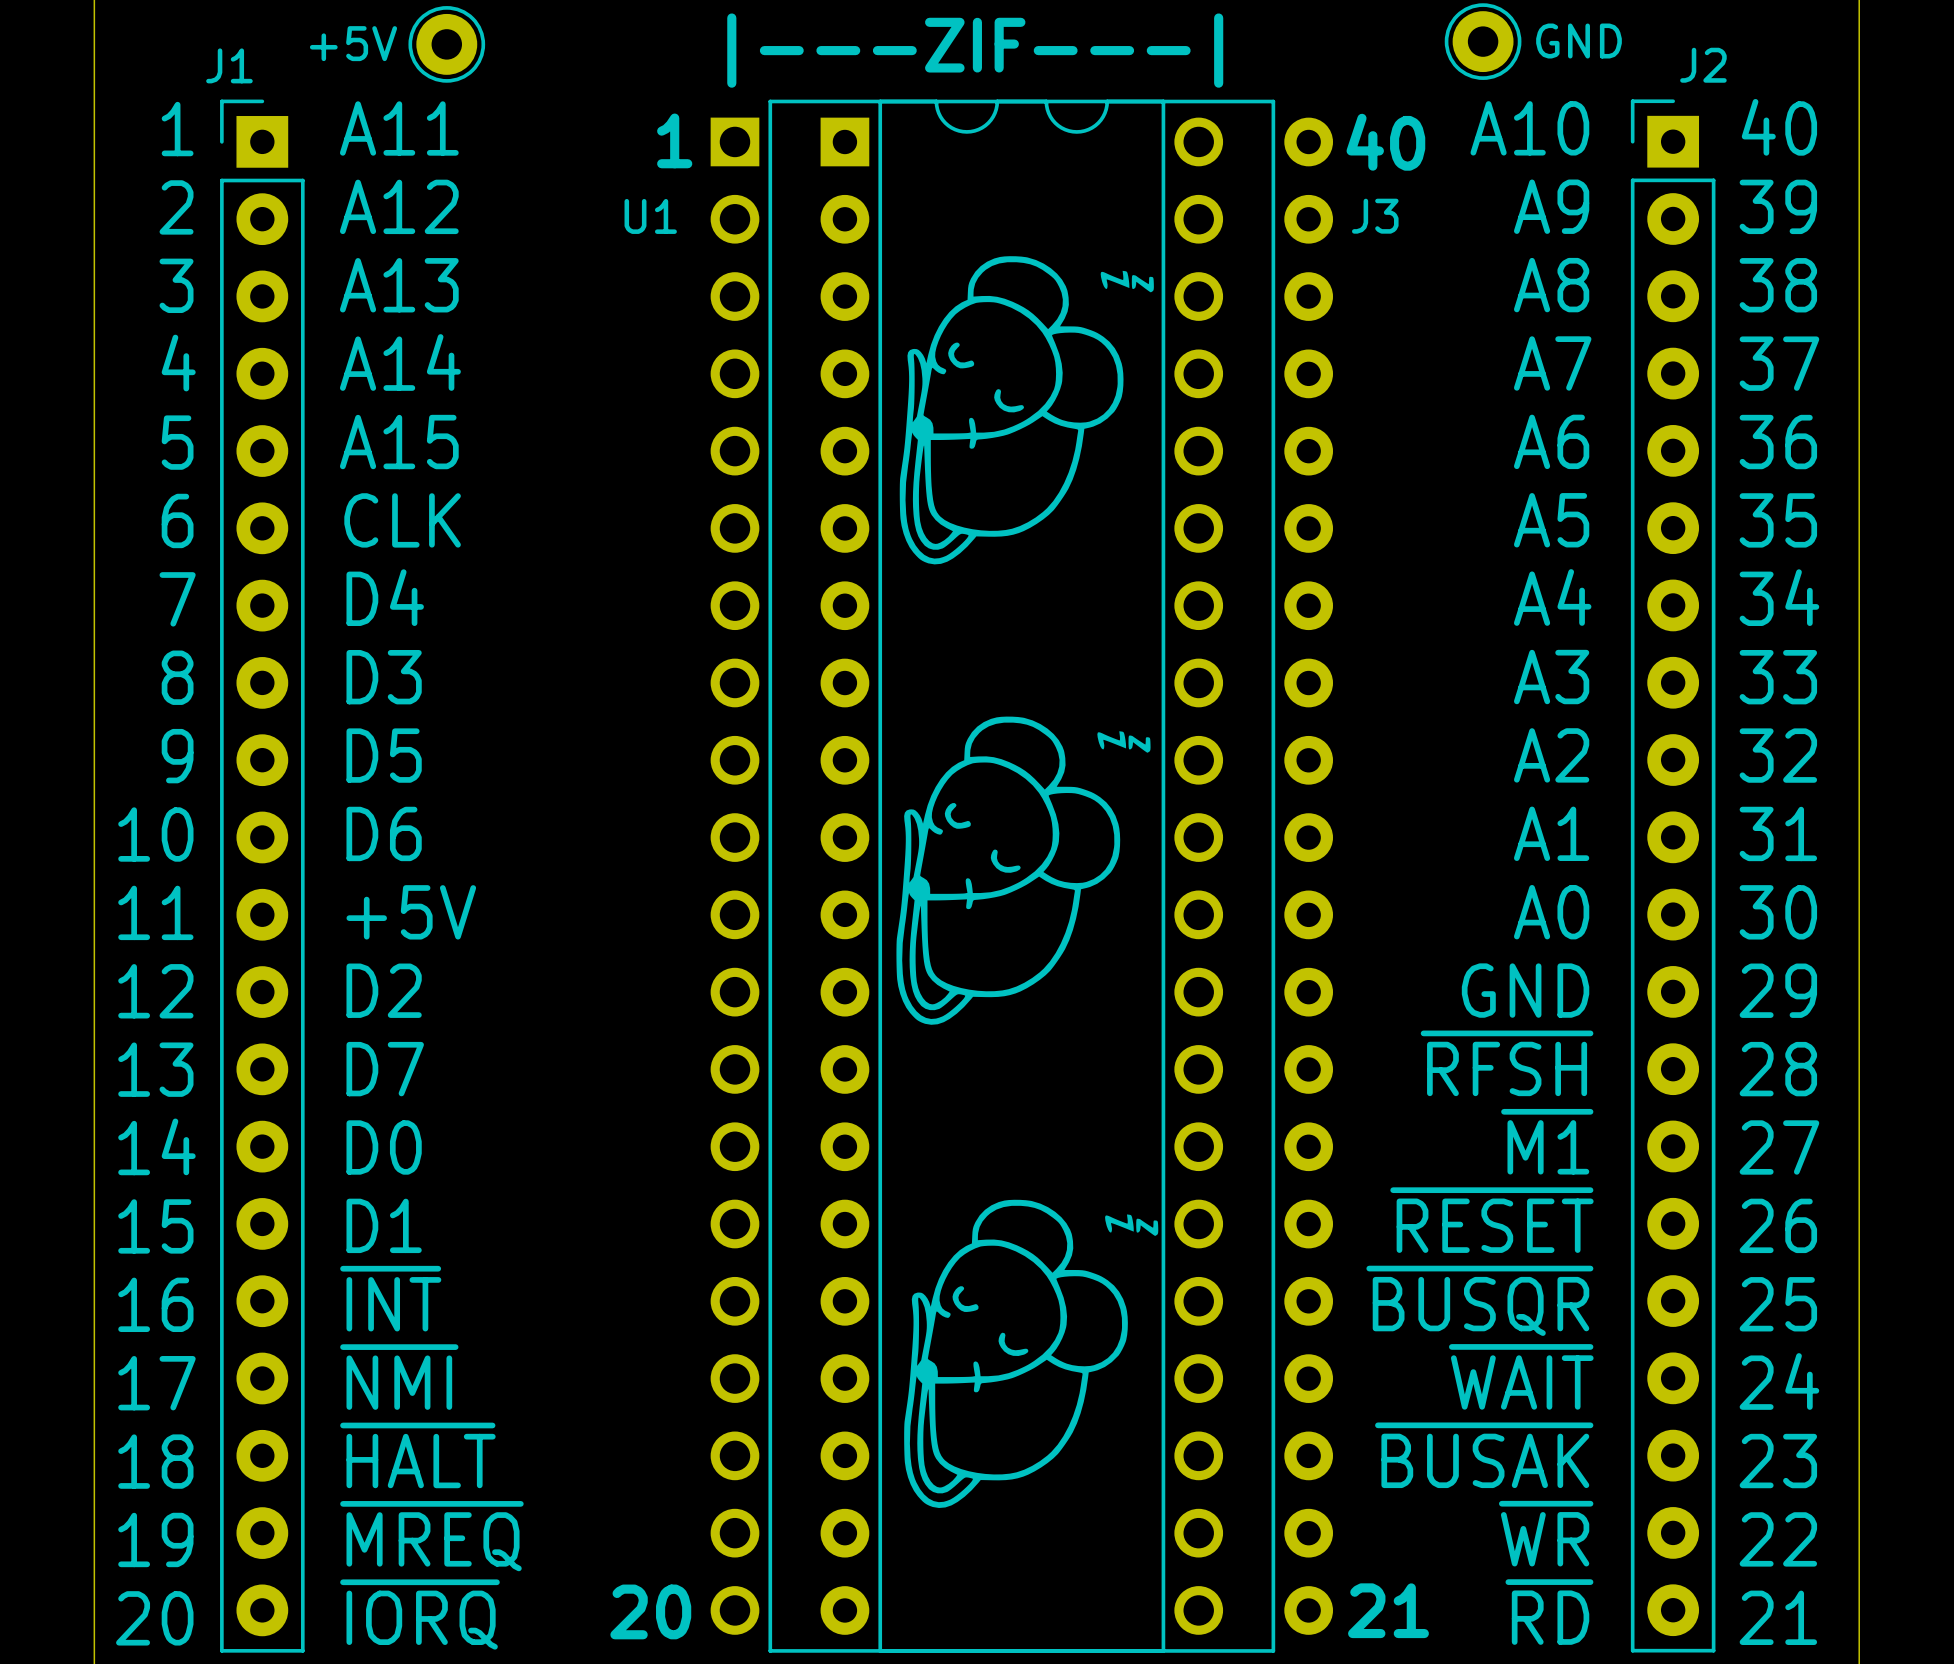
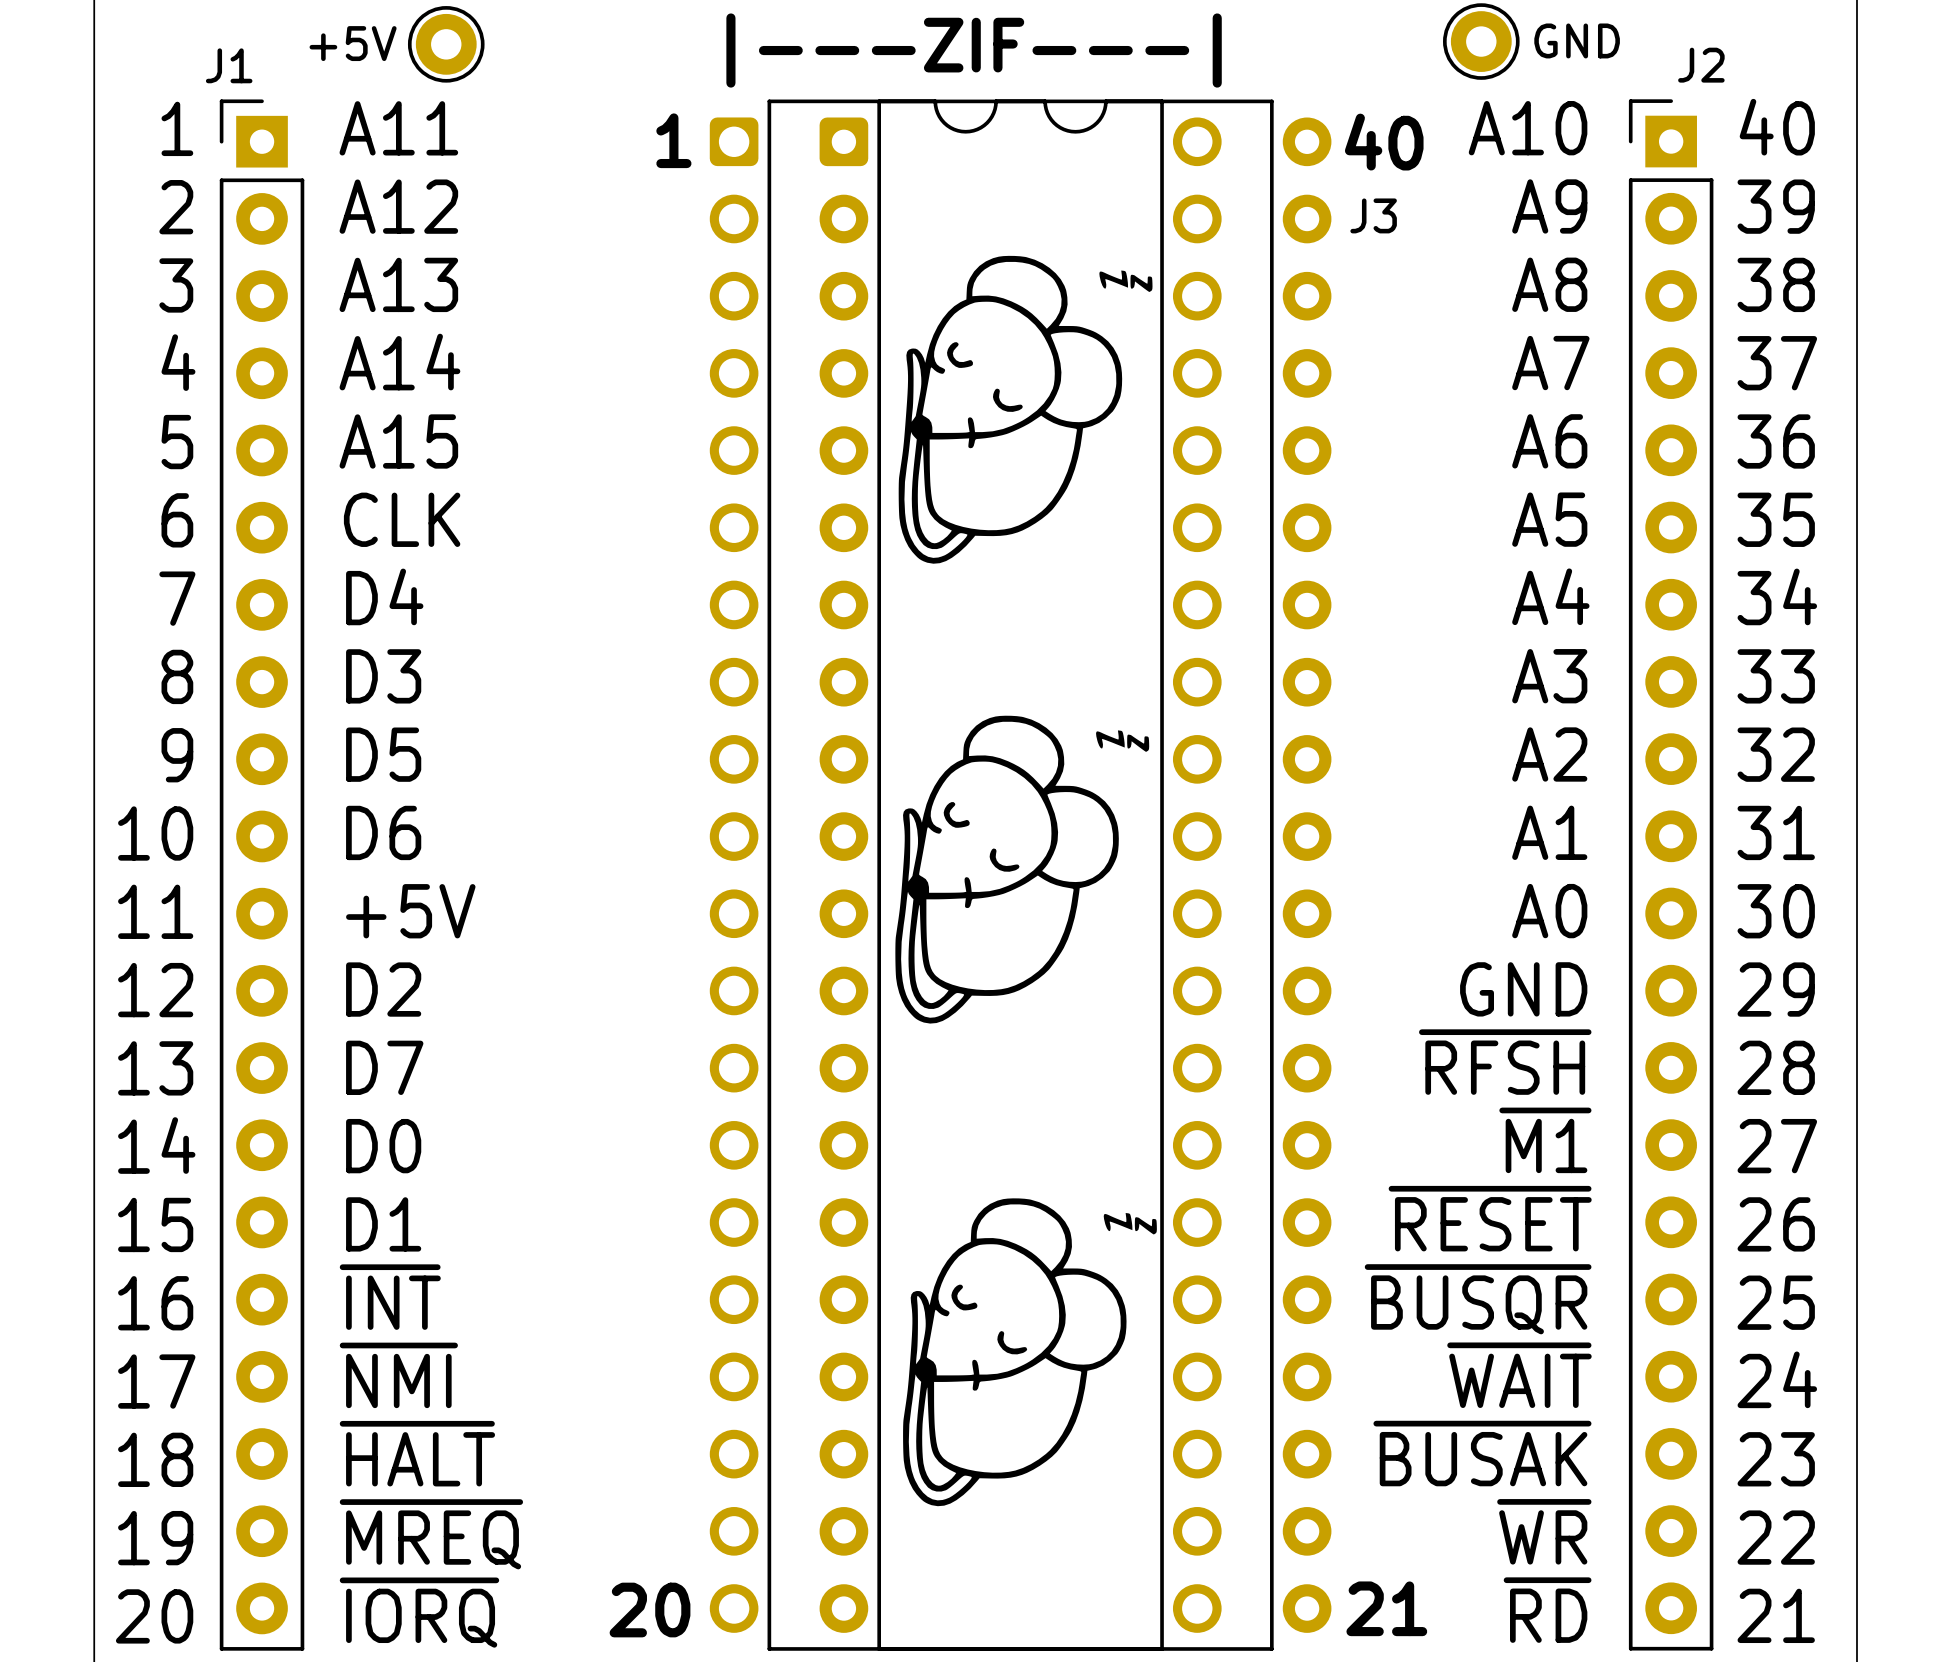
J3 footprint: [820, 99, 1334, 1653] -> [819, 99, 1332, 1651]
U1: (966, 876) -> none
part: none -> (965, 875)

